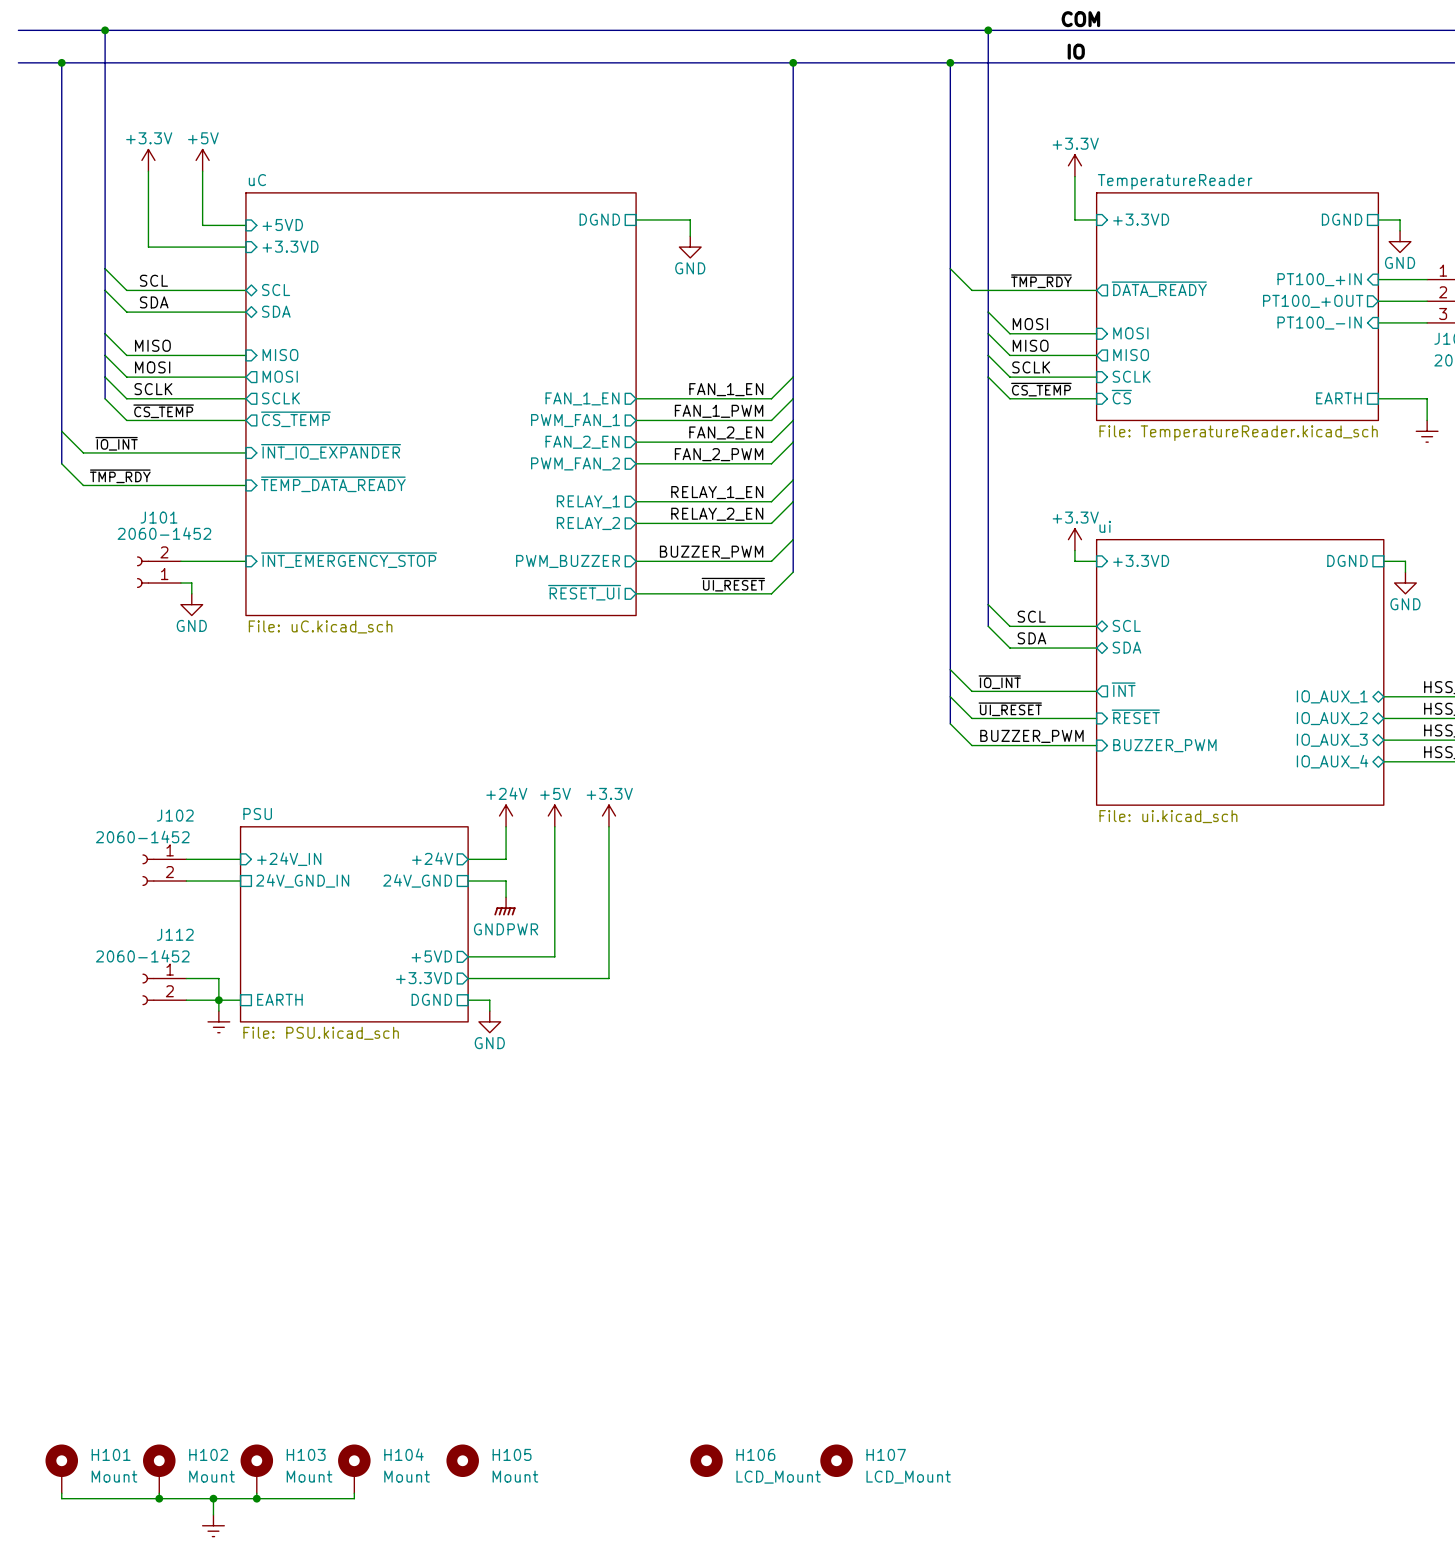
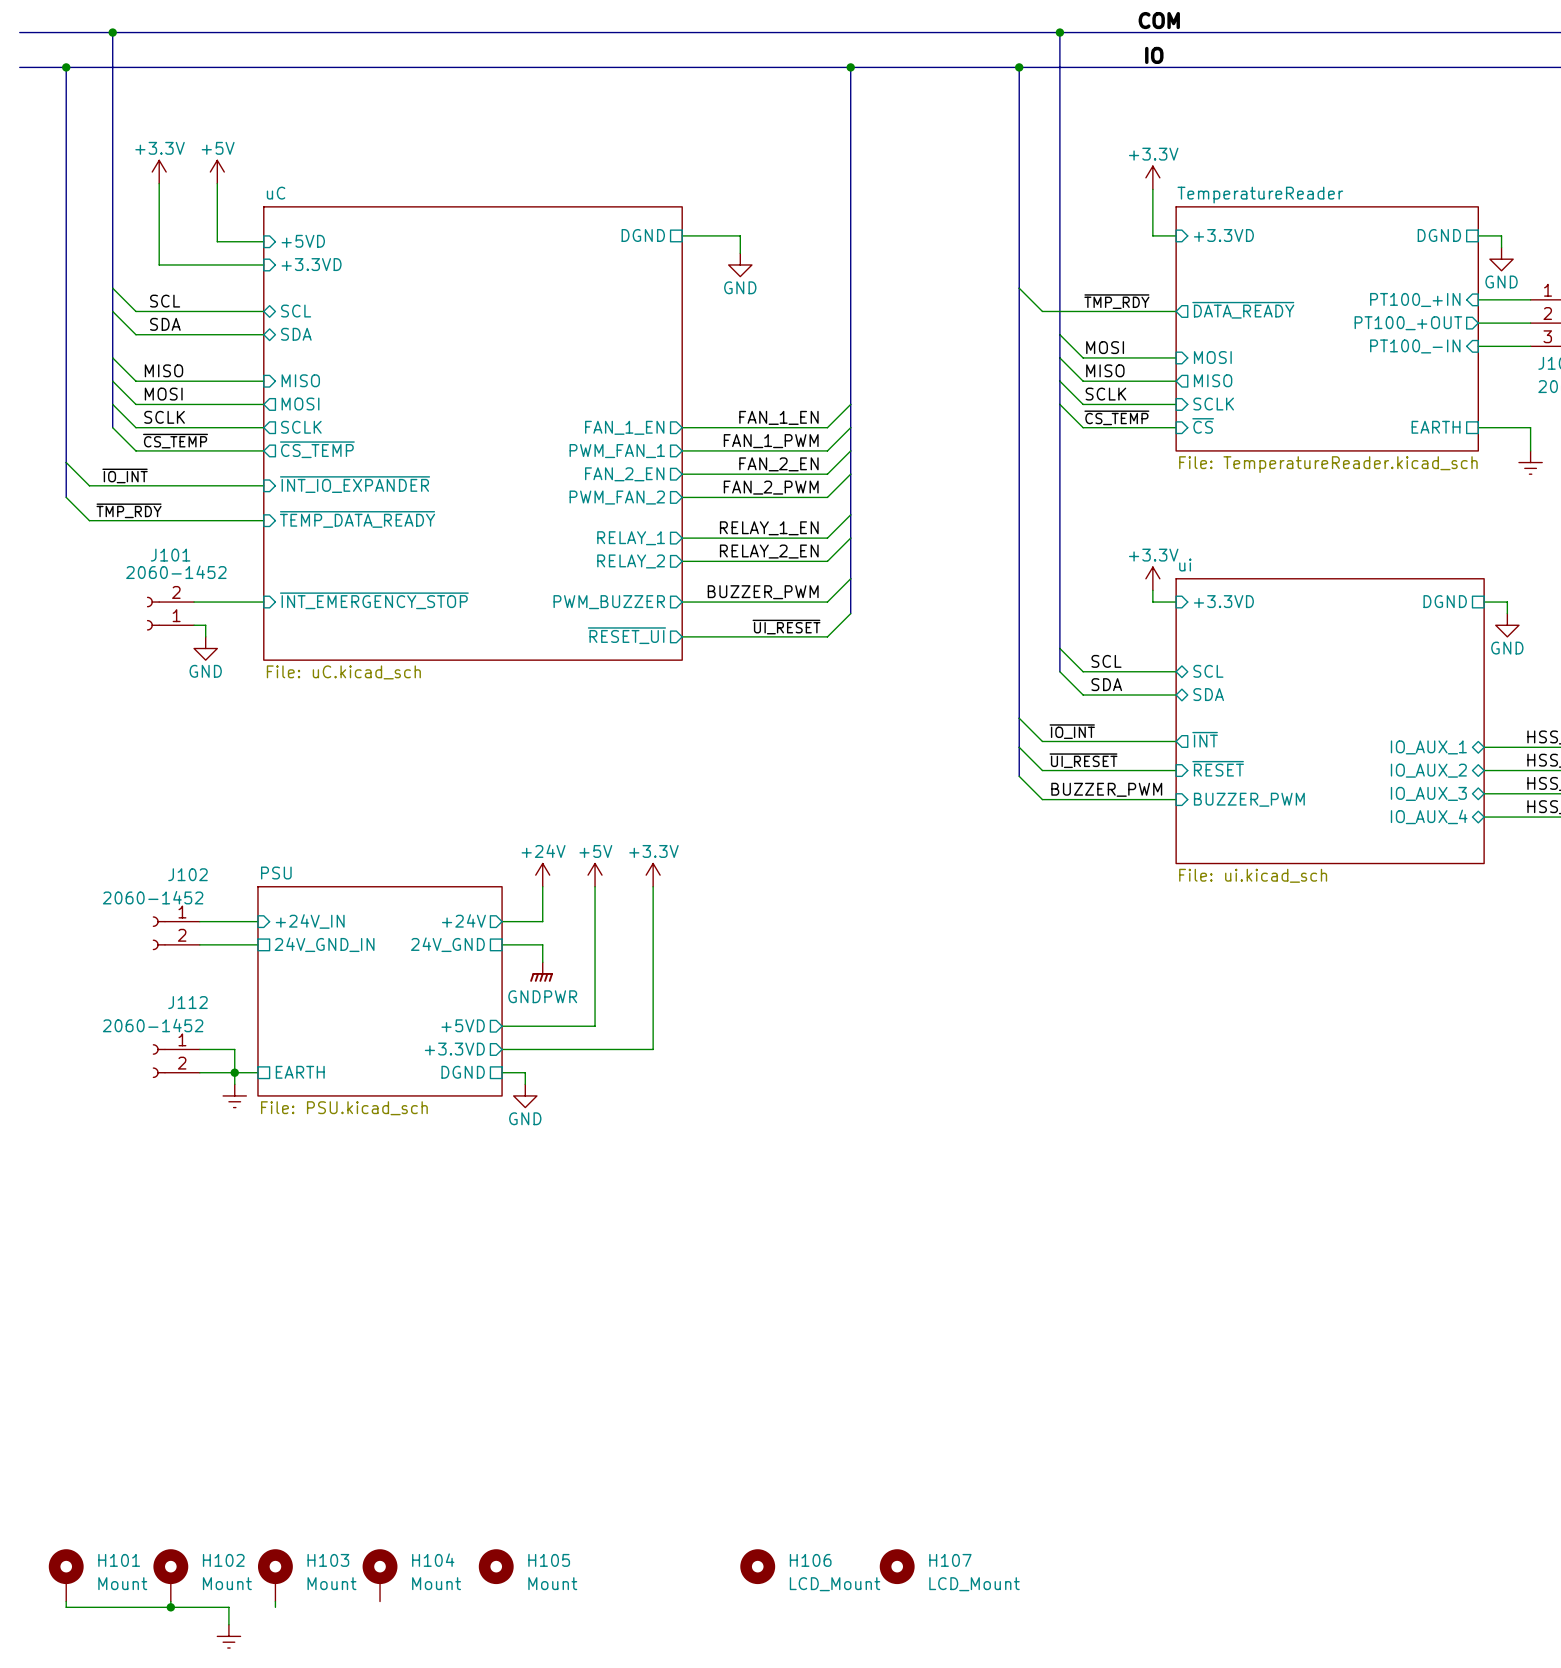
wire: (354, 1493) (354, 1498) (213, 1498) -> none
junction: (213, 1498) -> none
junction: (256, 1498) -> none

